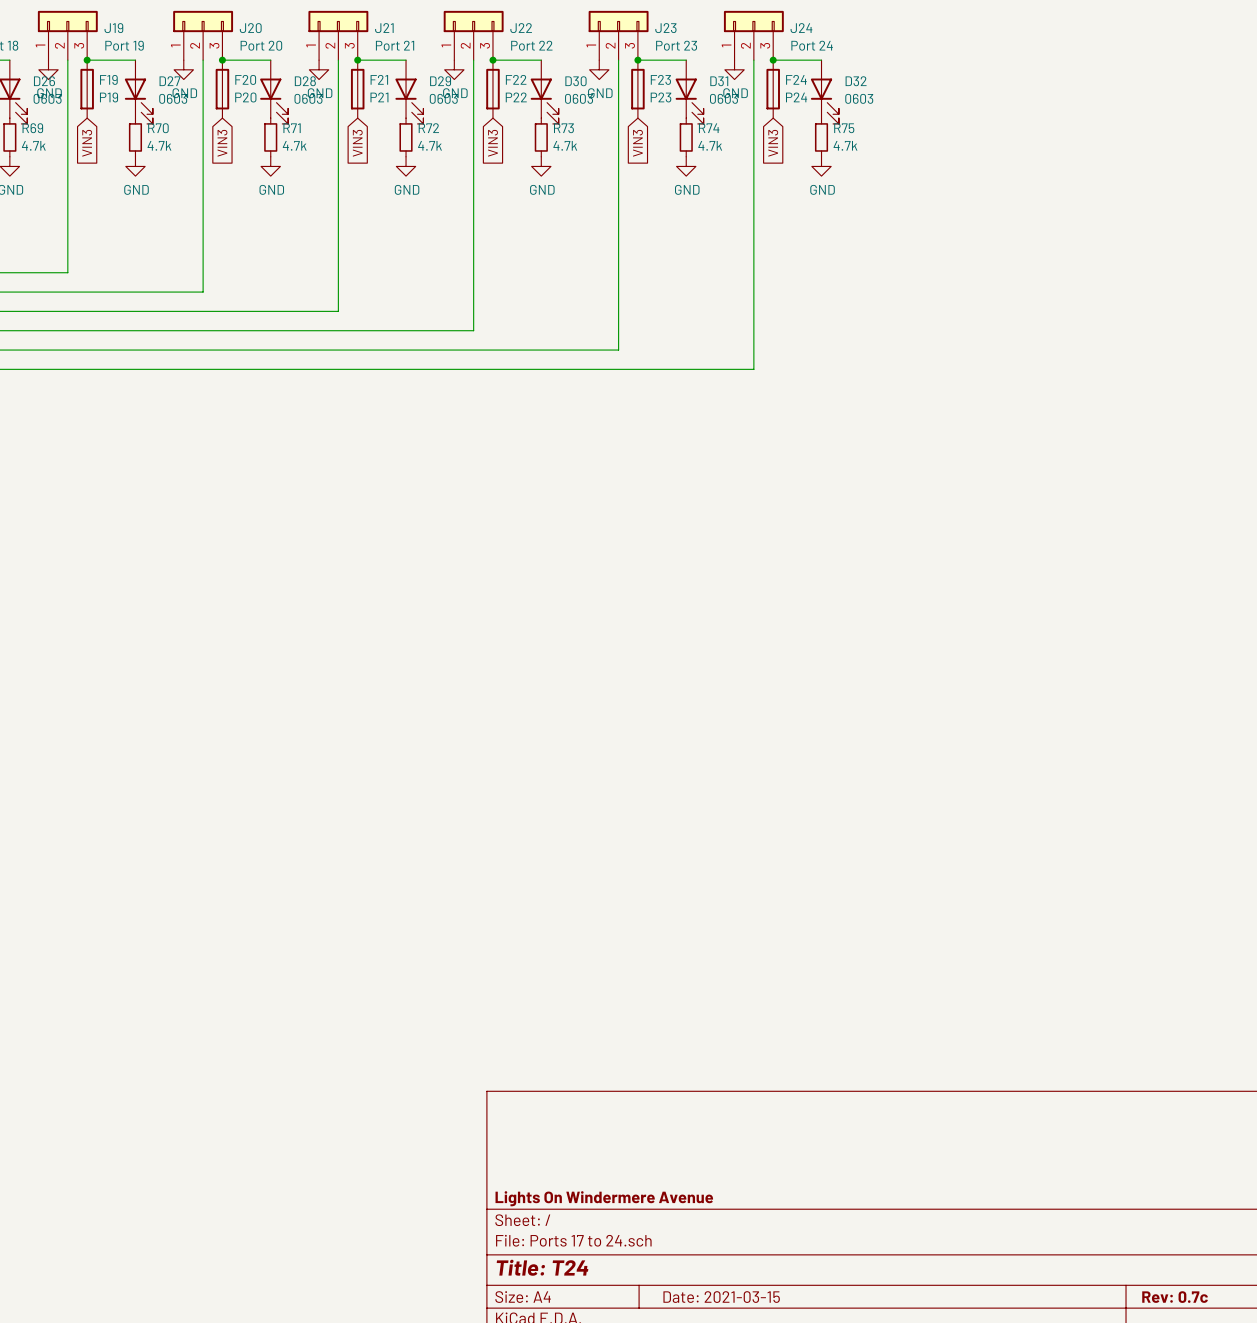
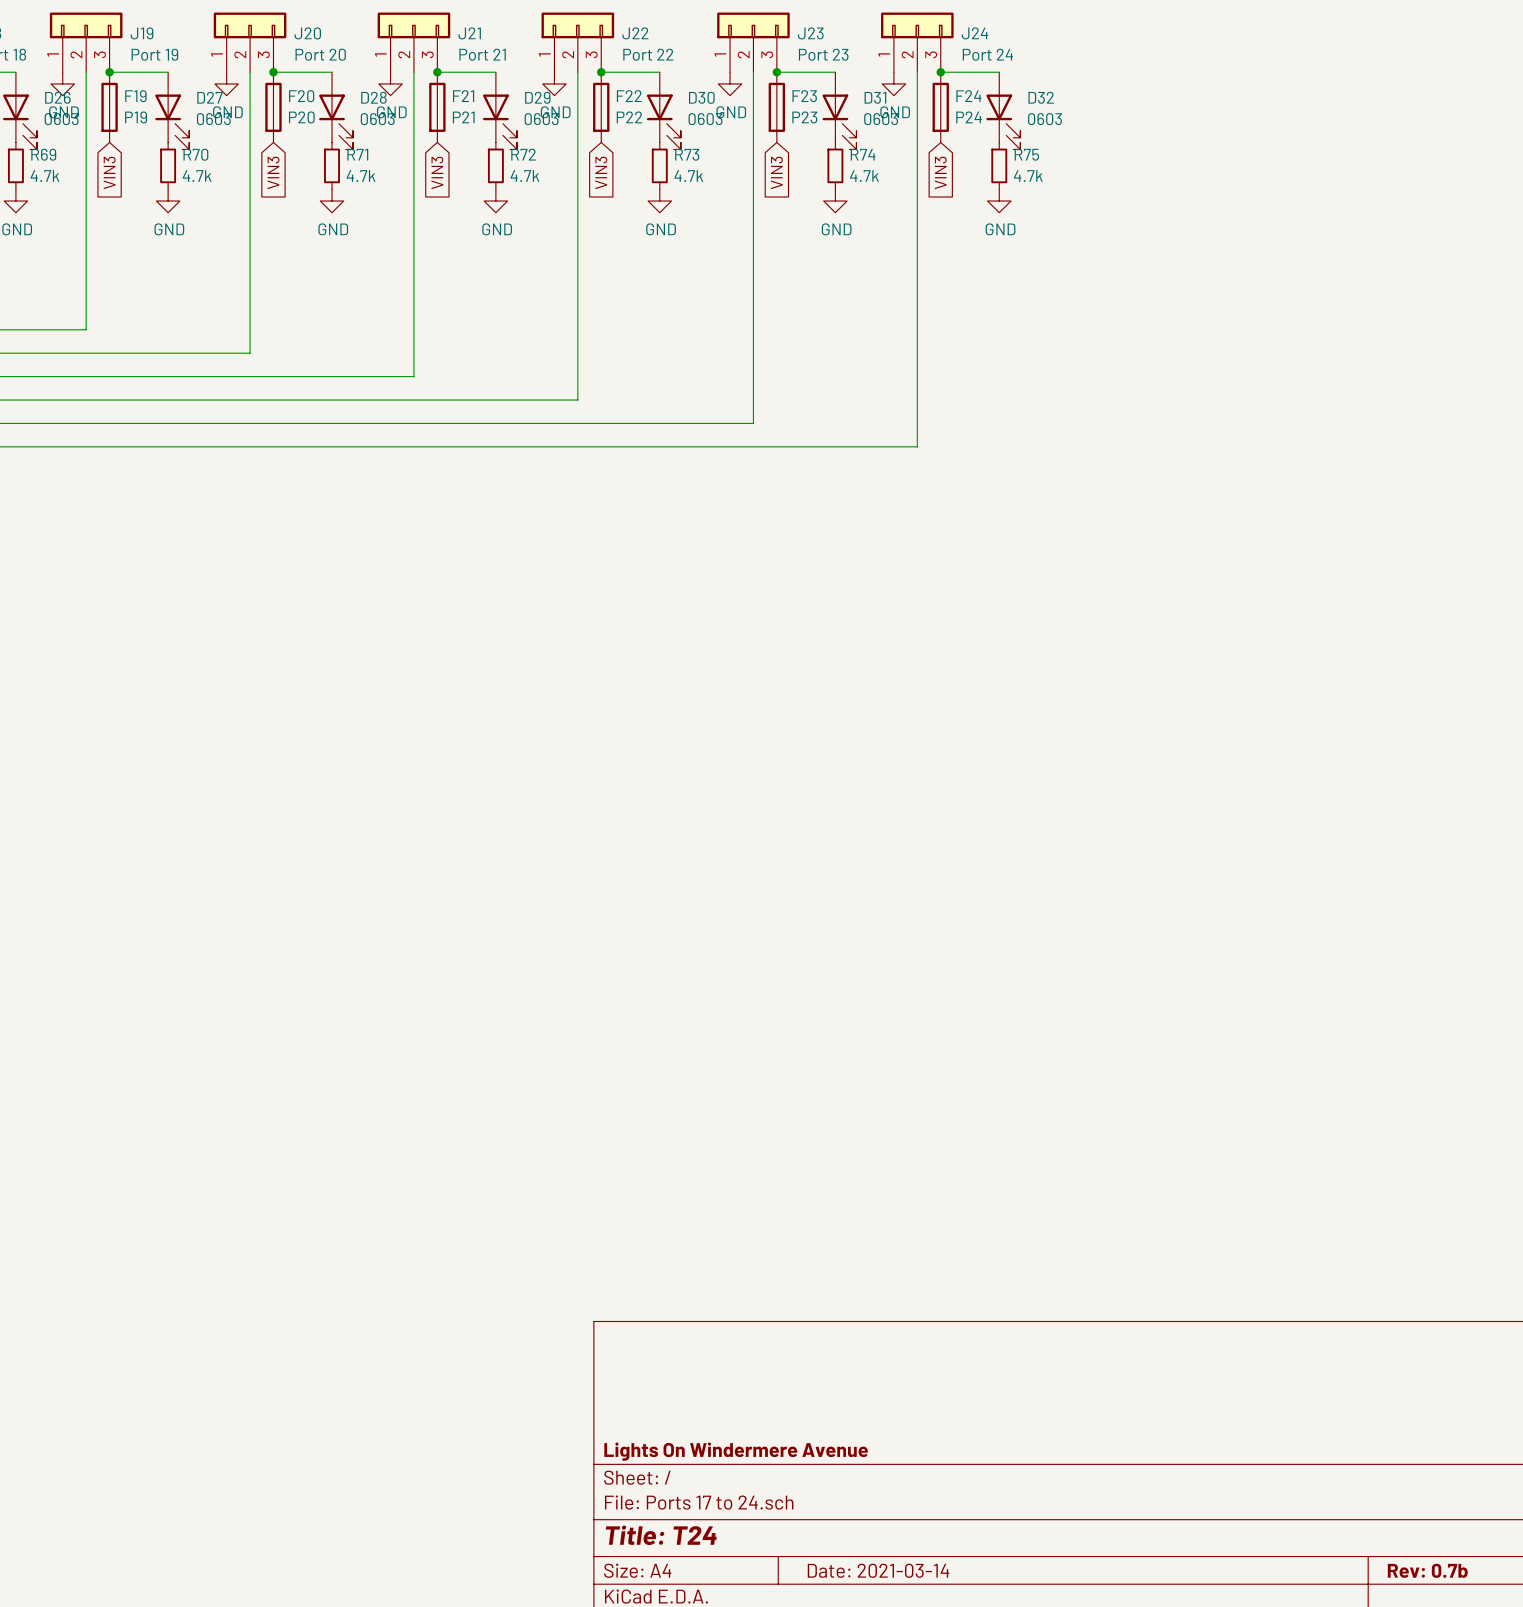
title block: Date: 2021-03-15 (721, 1297) -> Date: 2021-03-14 (878, 1570)
title block: Rev: 0.7c (1175, 1297) -> Rev: 0.7b (1427, 1570)

